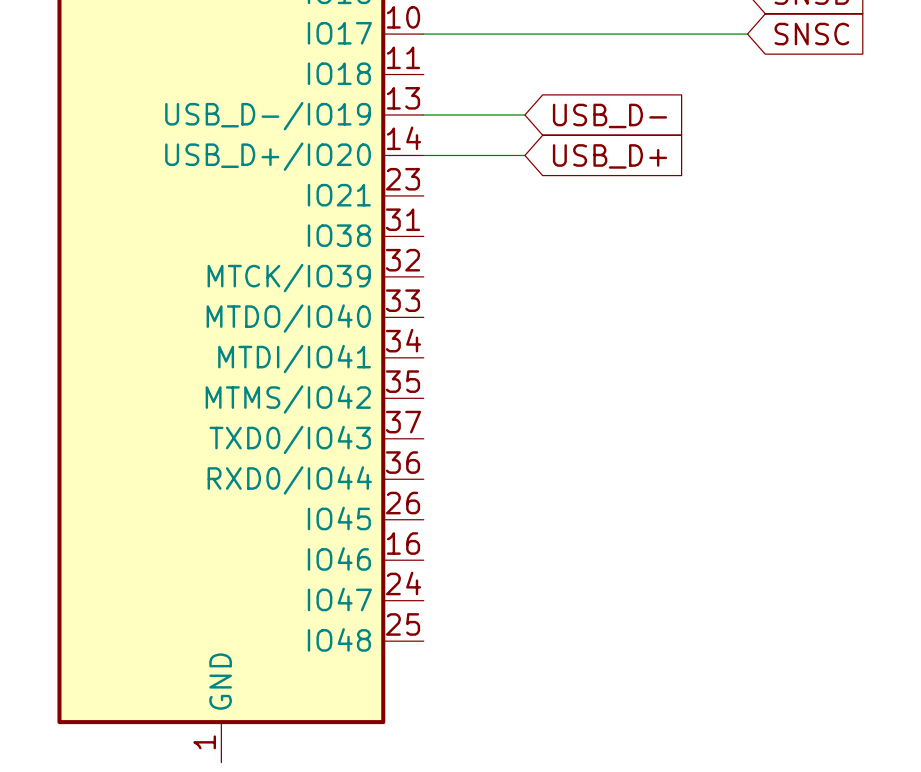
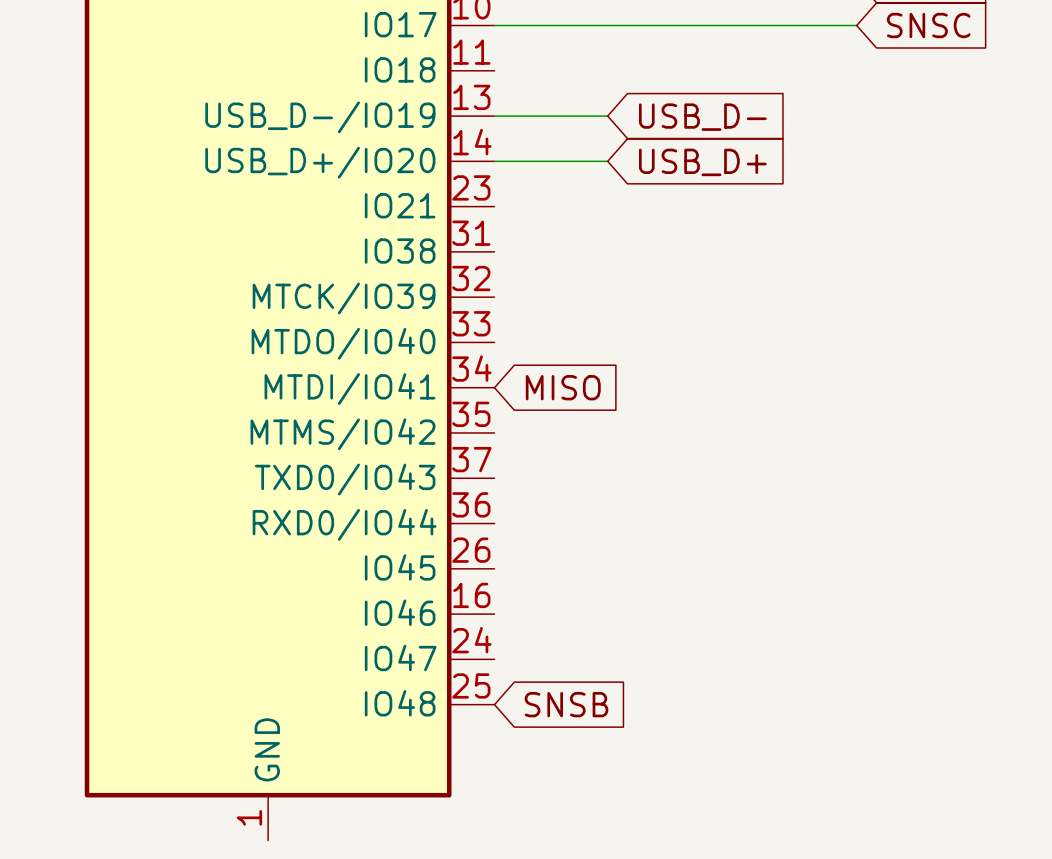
global label: none -> MISO (563, 387)
global label: none -> SNSB (566, 704)

